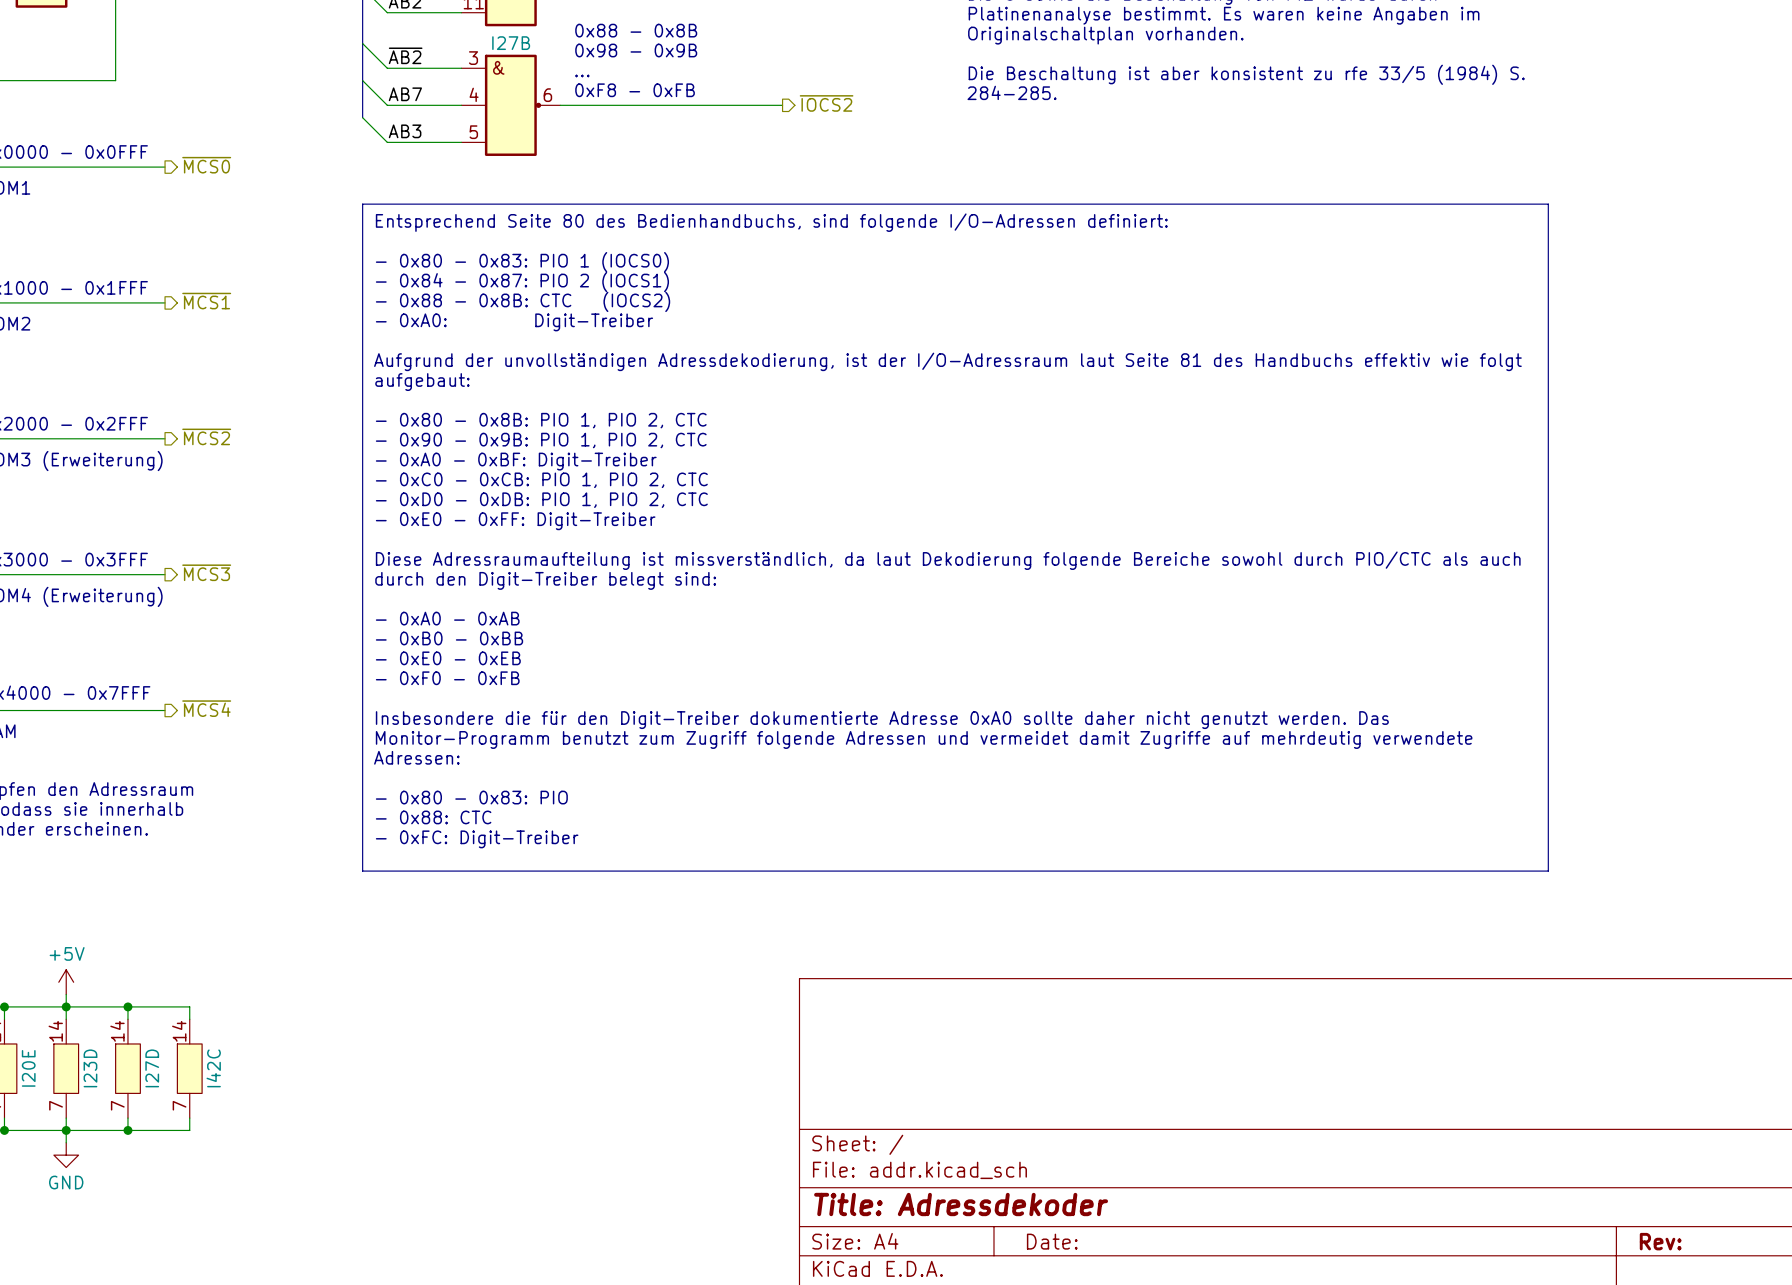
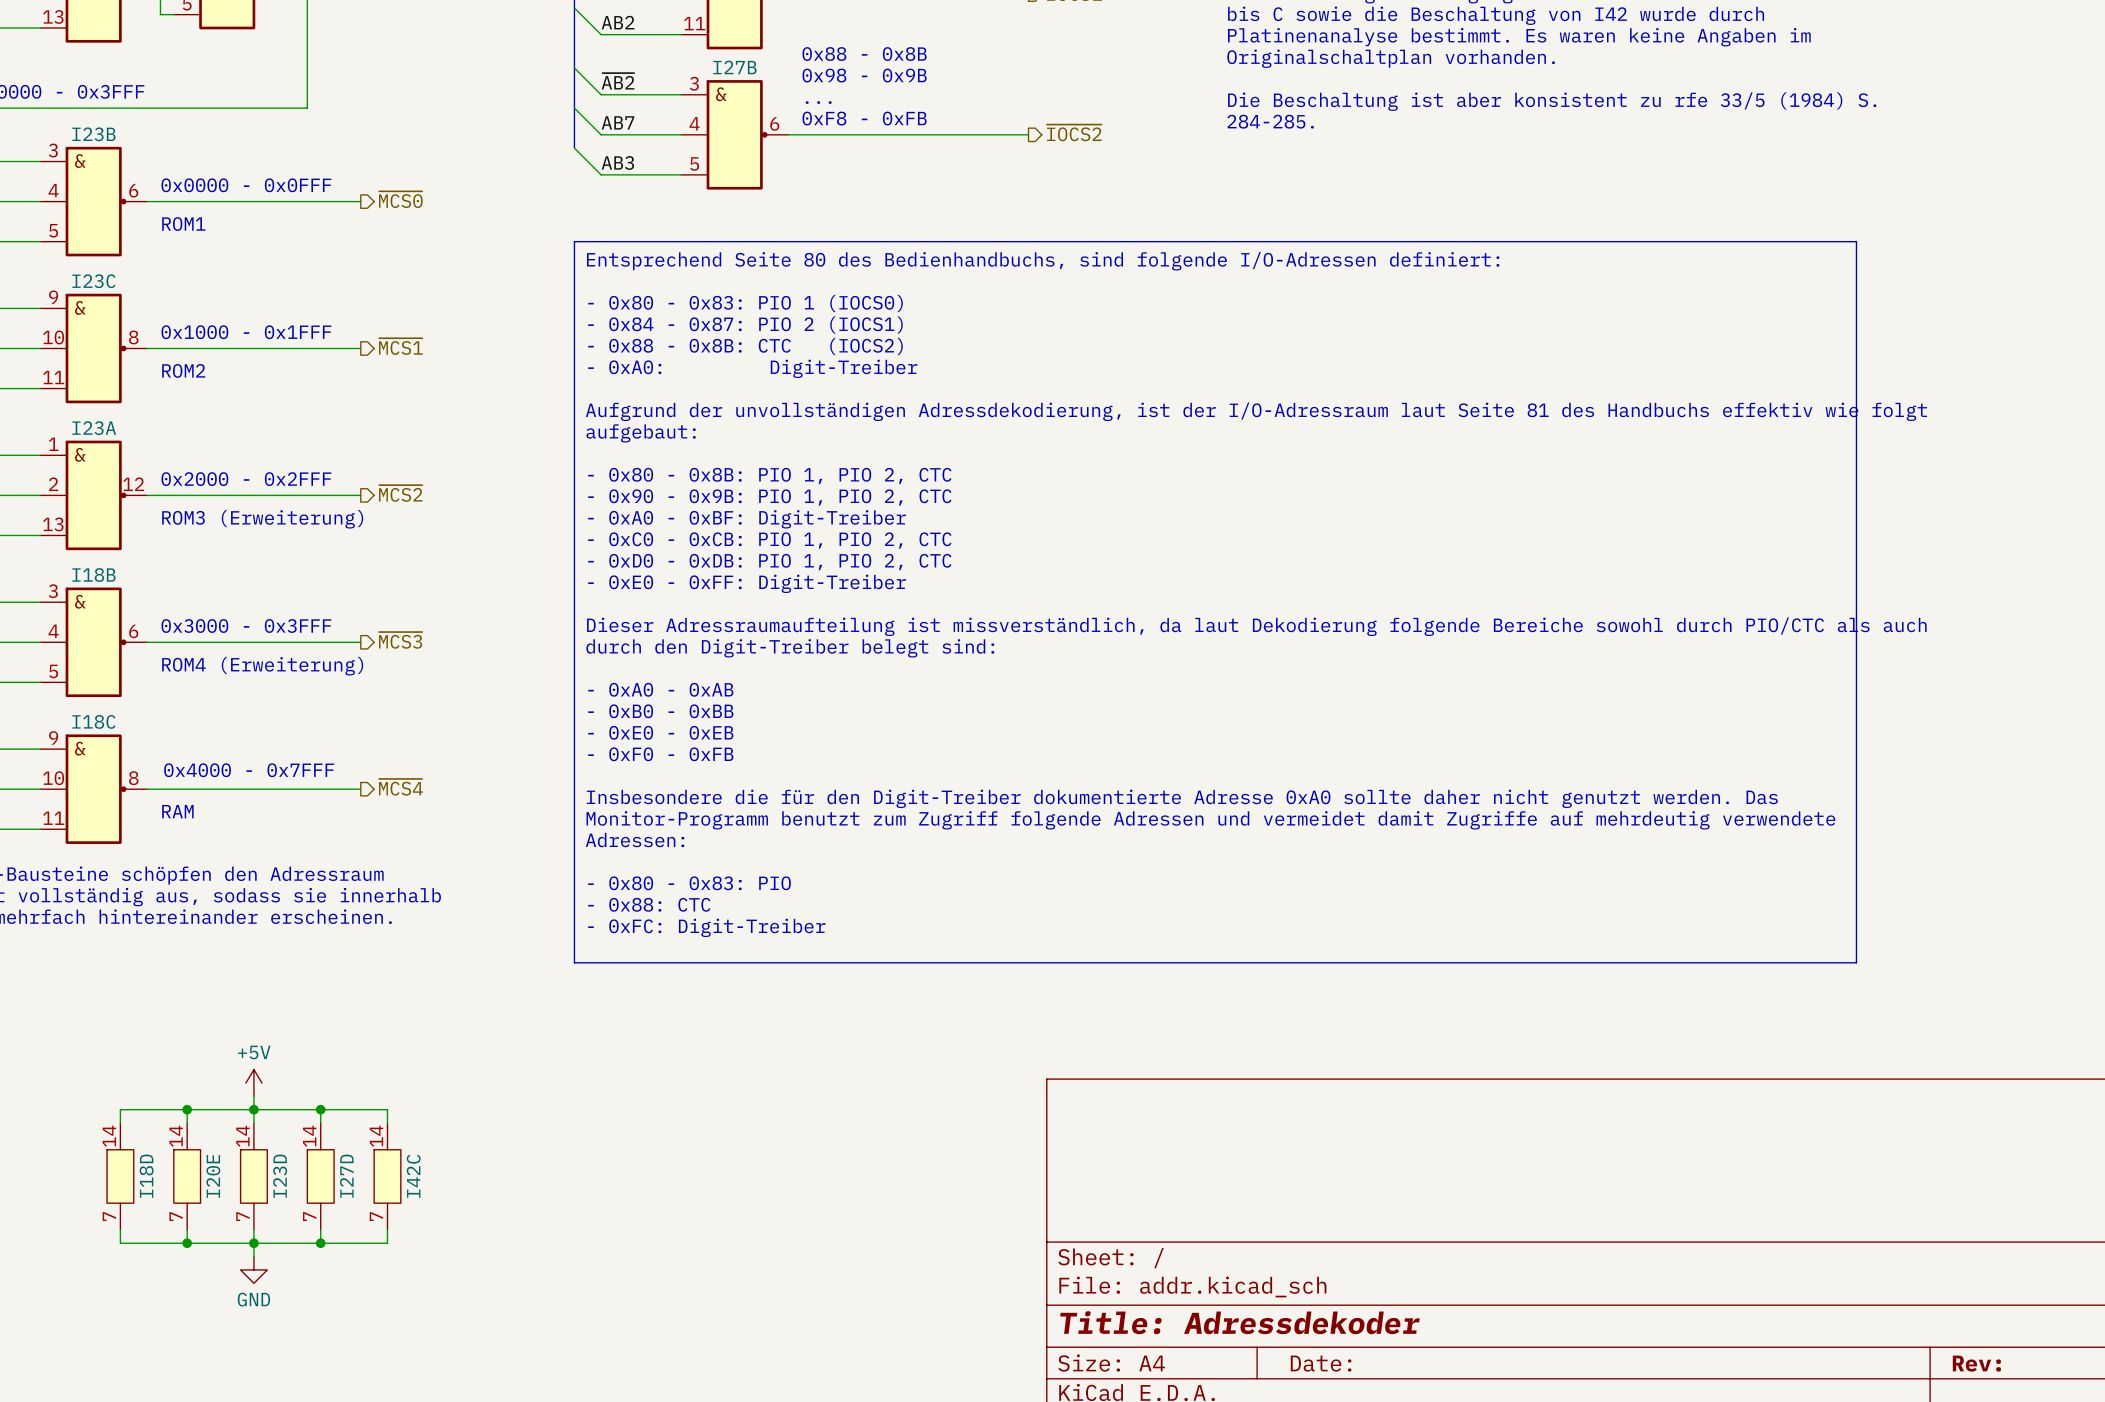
text: Diese Adressraumaufteilung ist missverständlich, da laut Dekodierung folgende Bereiche sowohl durch PIO/CTC als auch (948, 560) -> Dieser Adressraumaufteilung ist missverständlich, da laut Dekodierung folgende Bereiche sowohl durch PIO/CTC als auch (1256, 626)

